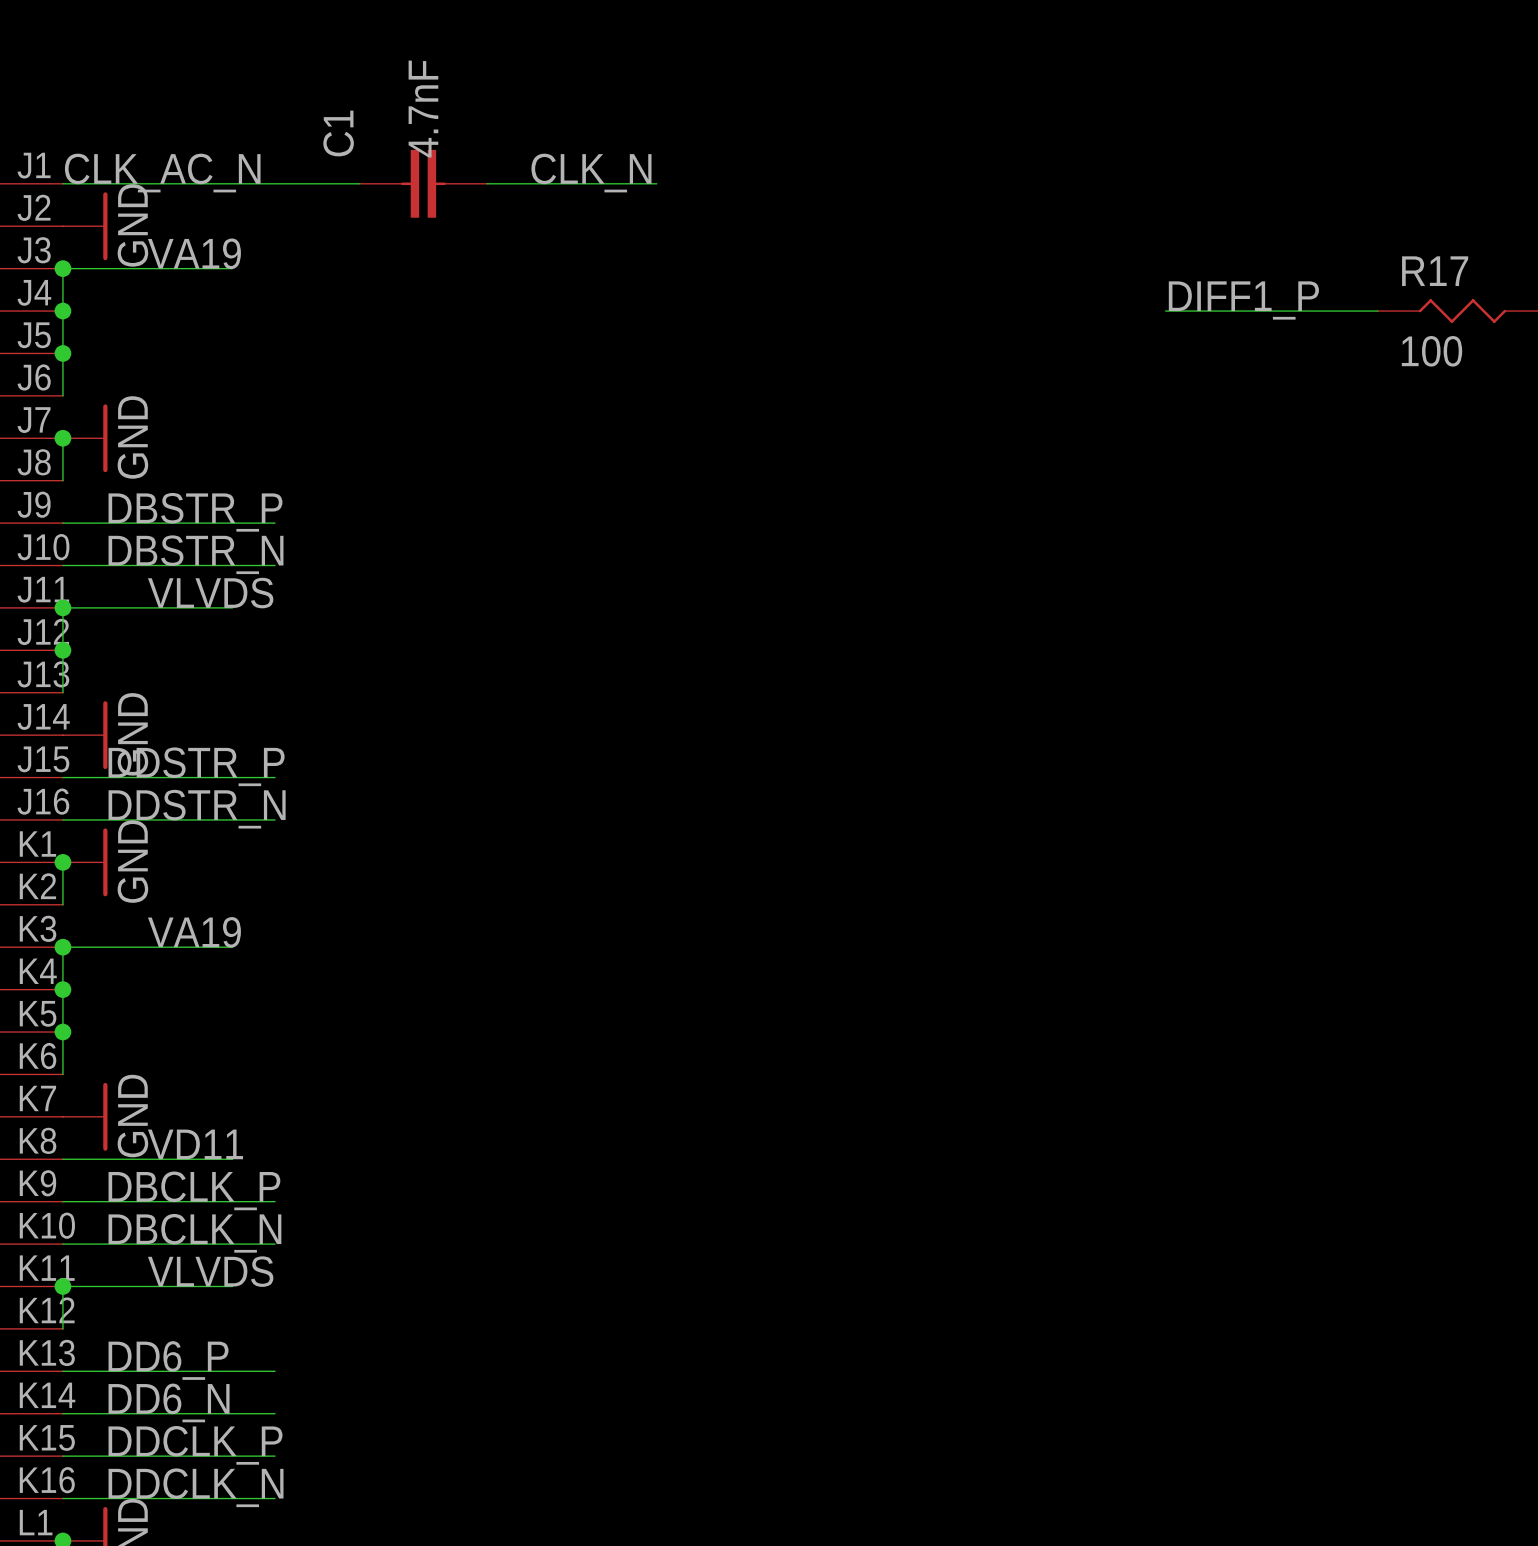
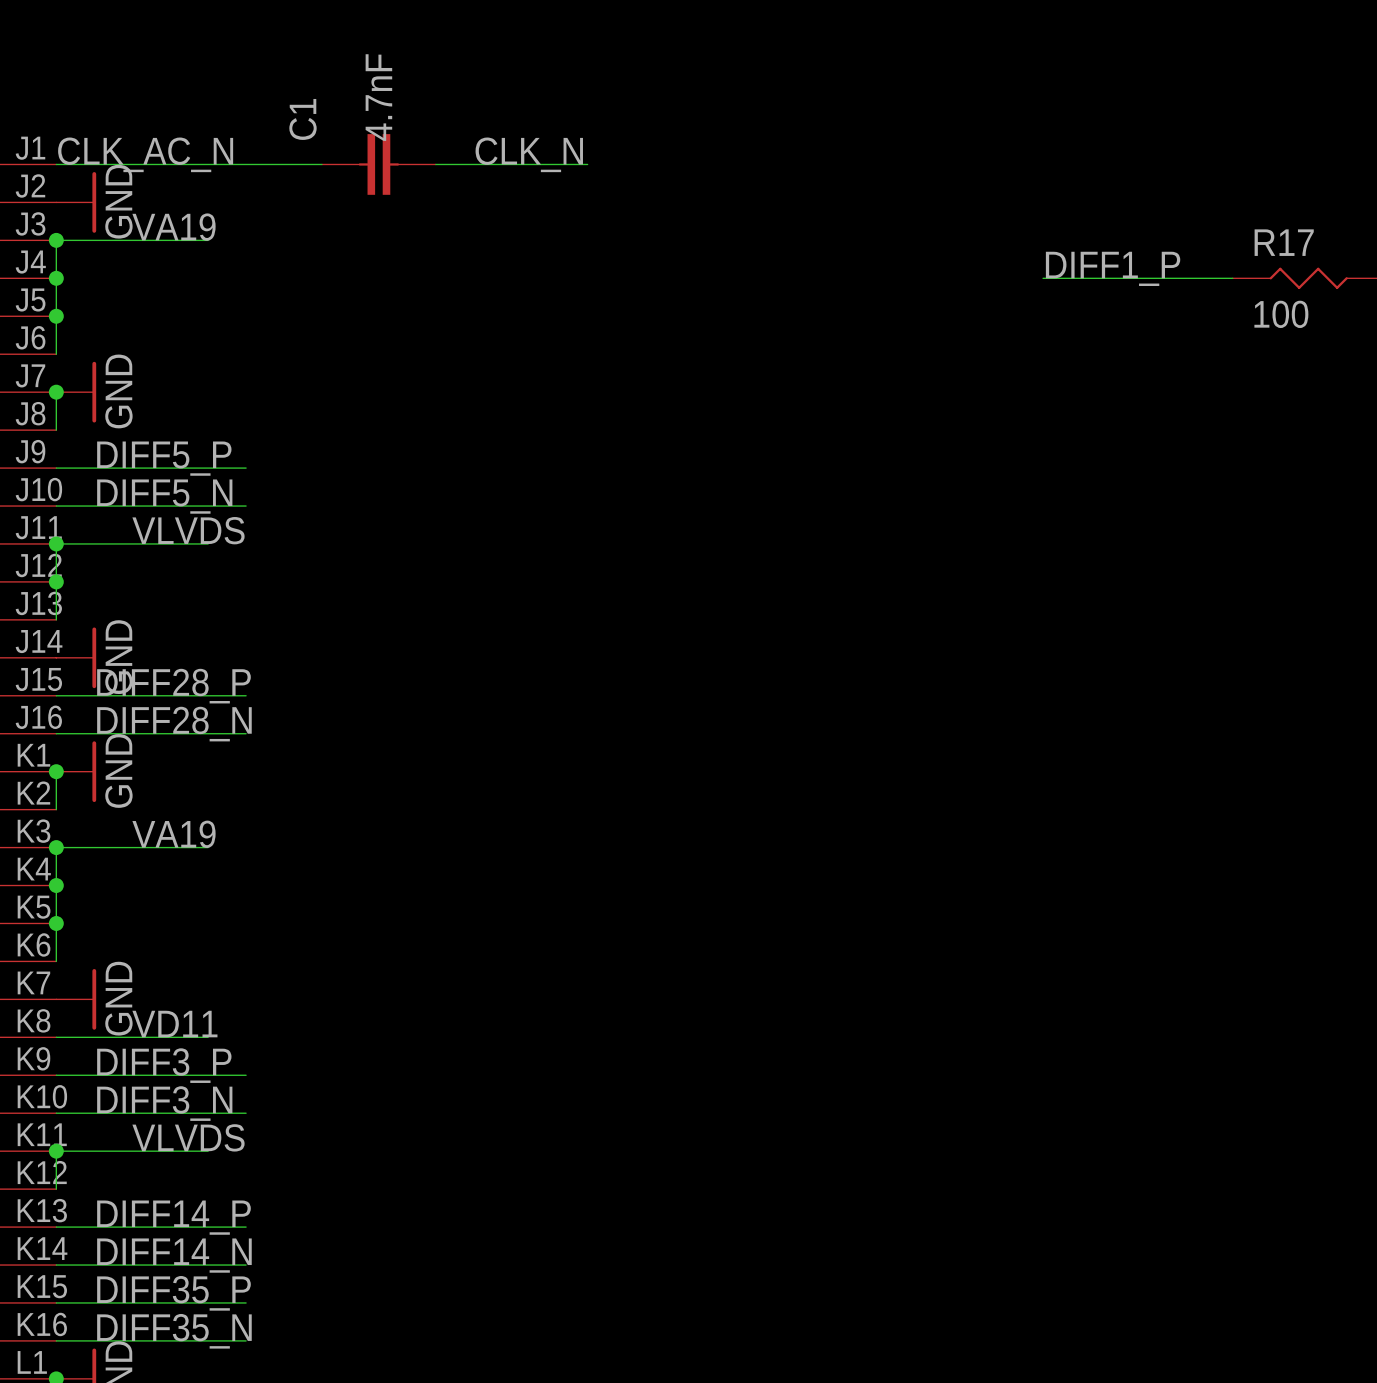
label: DBSTR_P (195, 512) -> DIFF5_P (164, 458)
label: DBSTR_N (196, 554) -> DIFF5_N (164, 496)
label: DDSTR_P (196, 766) -> DIFF28_P (173, 686)
label: DDSTR_N (197, 809) -> DIFF28_N (174, 724)
label: DBCLK_P (194, 1190) -> DIFF3_P (164, 1065)
label: DBCLK_N (194, 1233) -> DIFF3_N (164, 1103)
label: DD6_P (168, 1360) -> DIFF14_P (173, 1217)
label: DD6_N (169, 1402) -> DIFF14_N (174, 1255)
label: DDCLK_P (195, 1445) -> DIFF35_P (173, 1293)
label: DDCLK_N (196, 1487) -> DIFF35_N (174, 1331)

